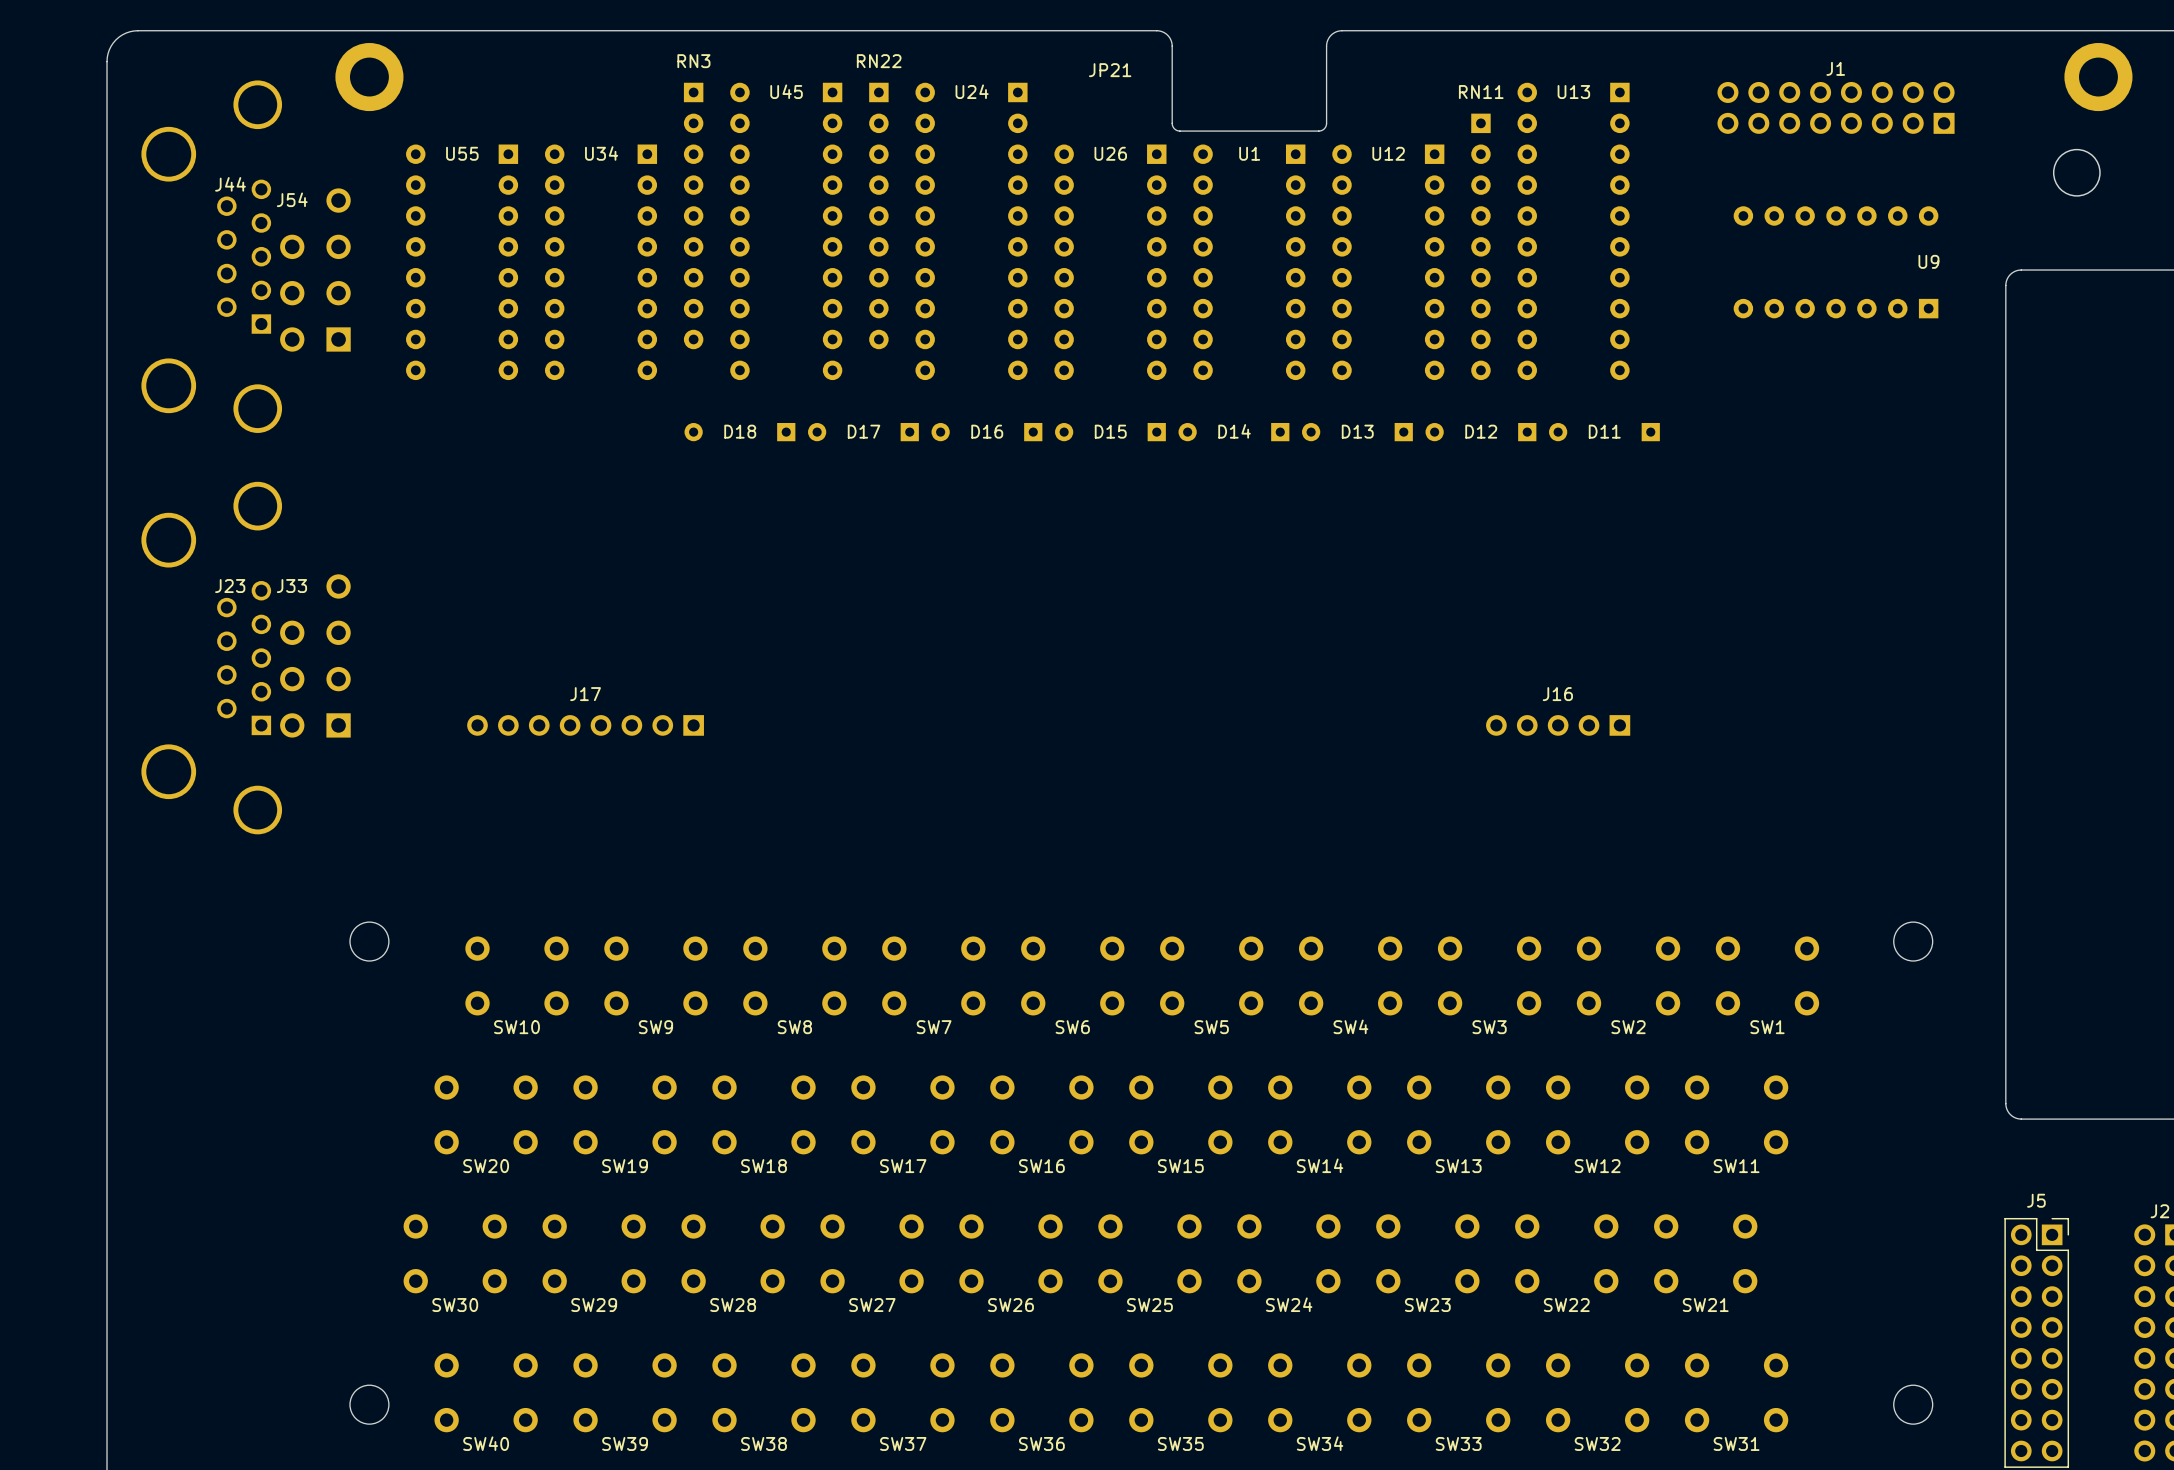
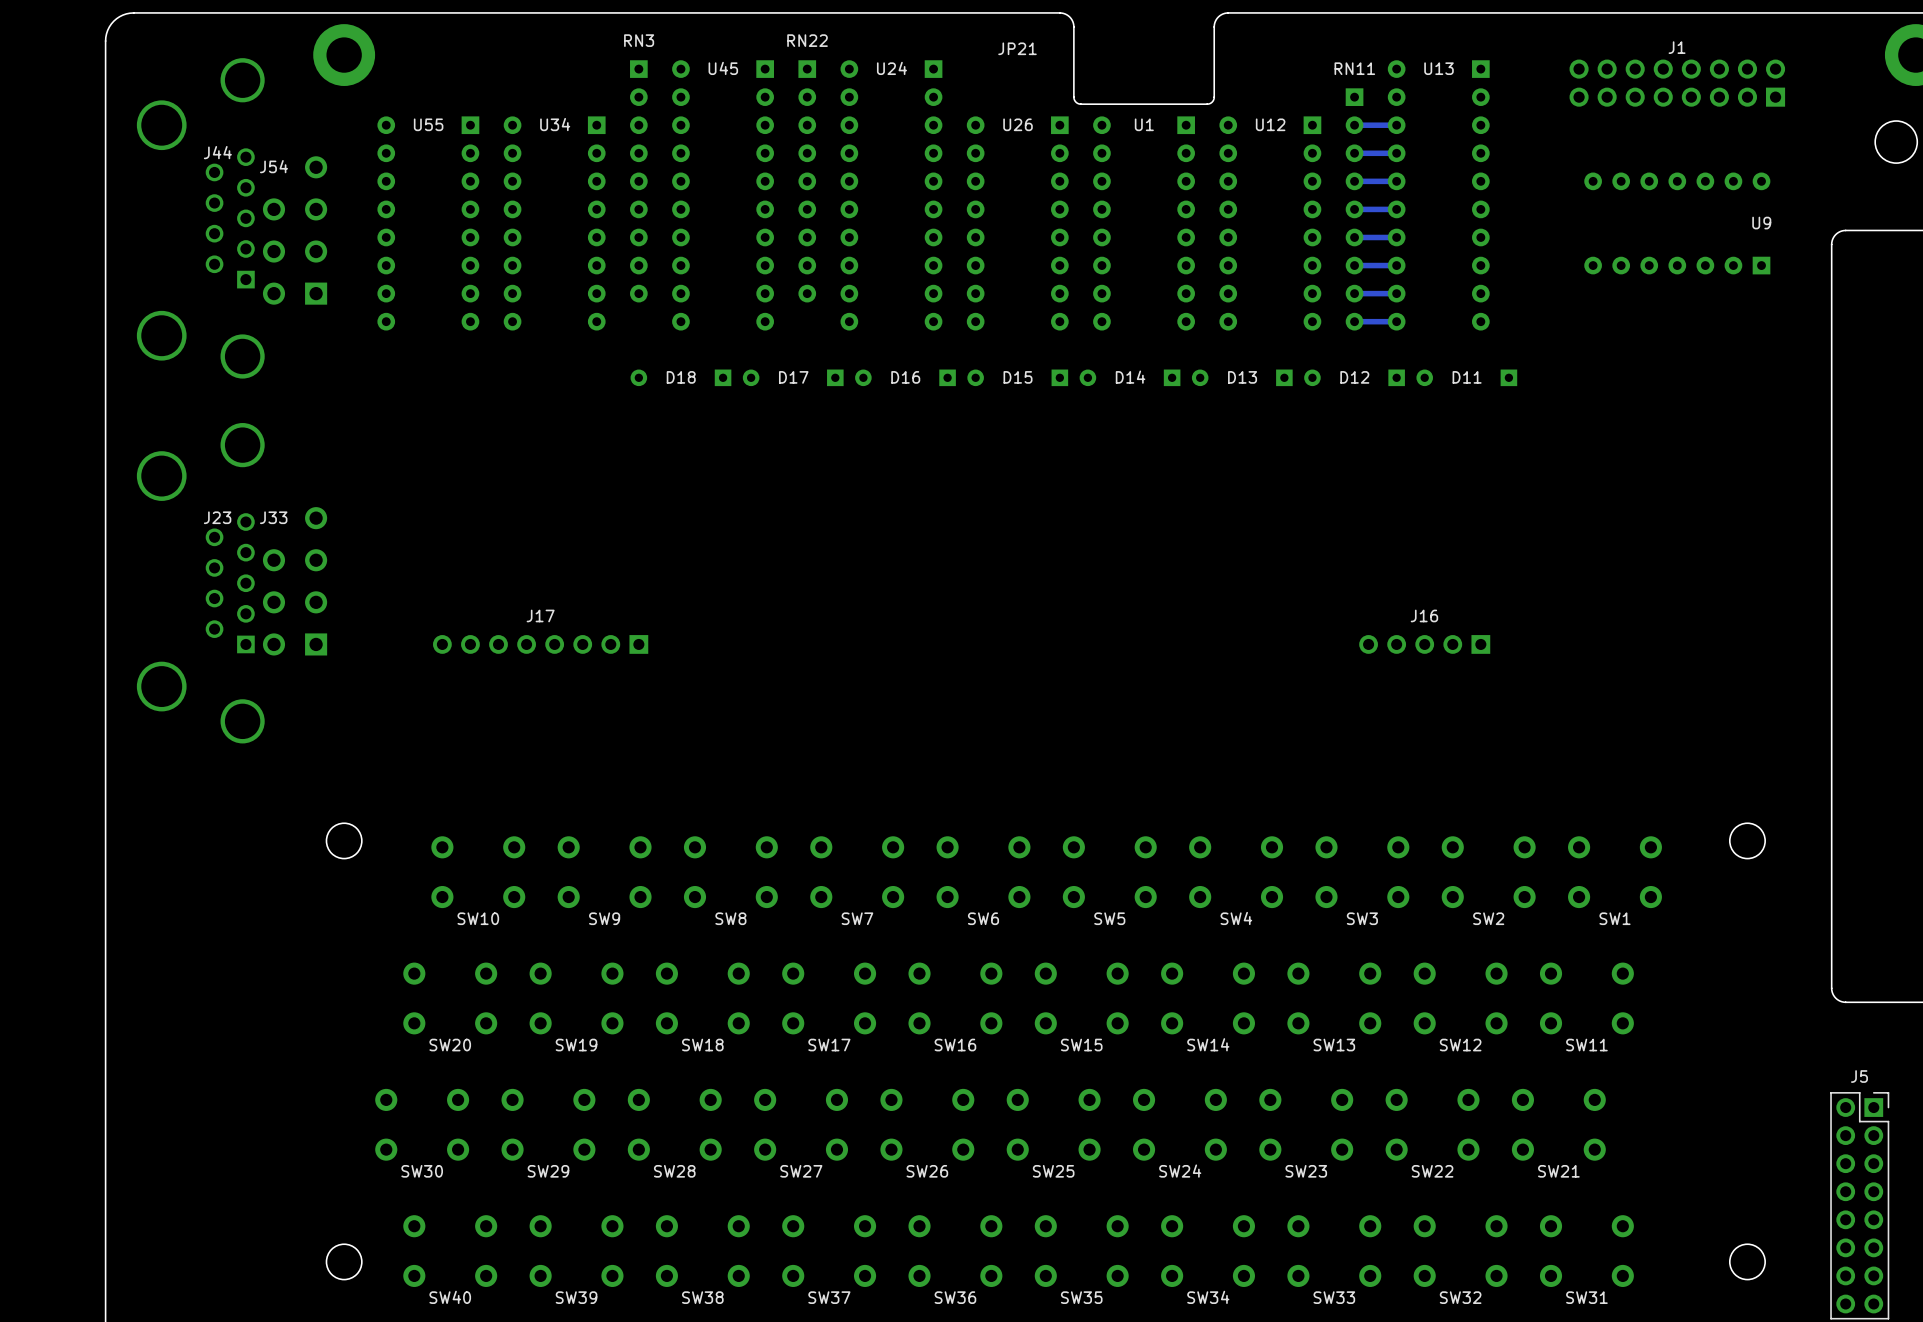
track: none -> (1396, 125) (1354, 125)
track: none -> (1396, 153) (1354, 153)
track: none -> (1396, 181) (1354, 181)
track: none -> (1396, 209) (1354, 209)
track: none -> (1396, 237) (1354, 237)
track: none -> (1396, 265) (1354, 265)
track: none -> (1396, 293) (1354, 293)
track: none -> (1396, 321) (1354, 321)

